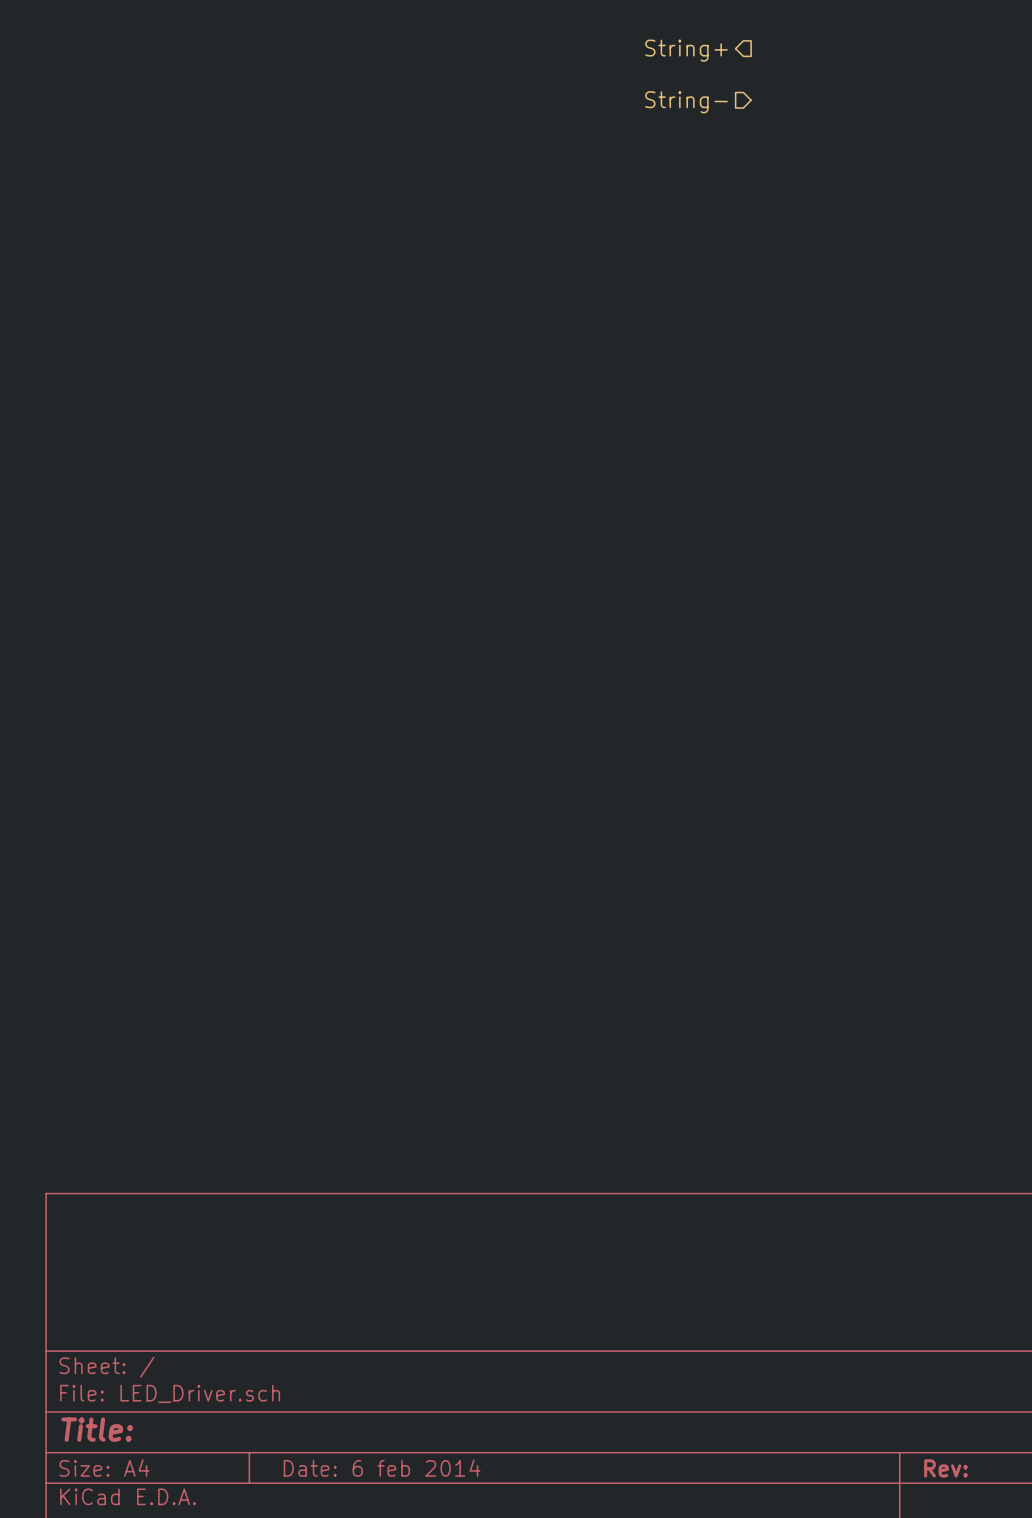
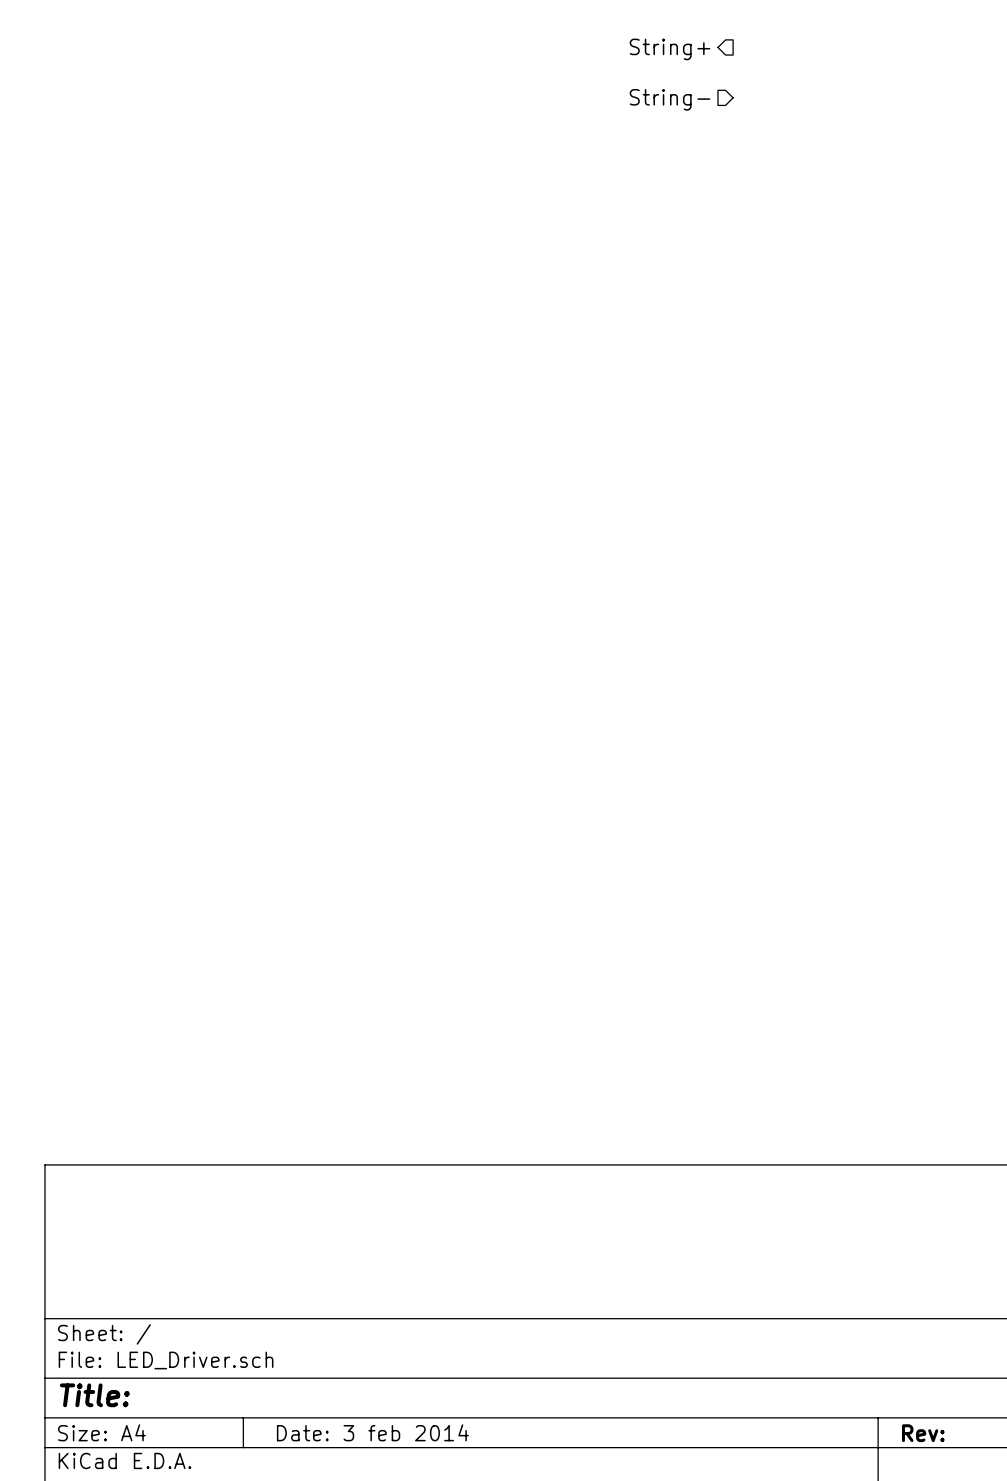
title block: Date: 6 feb 2014 (382, 1468) -> Date: 3 feb 2014 (372, 1432)

